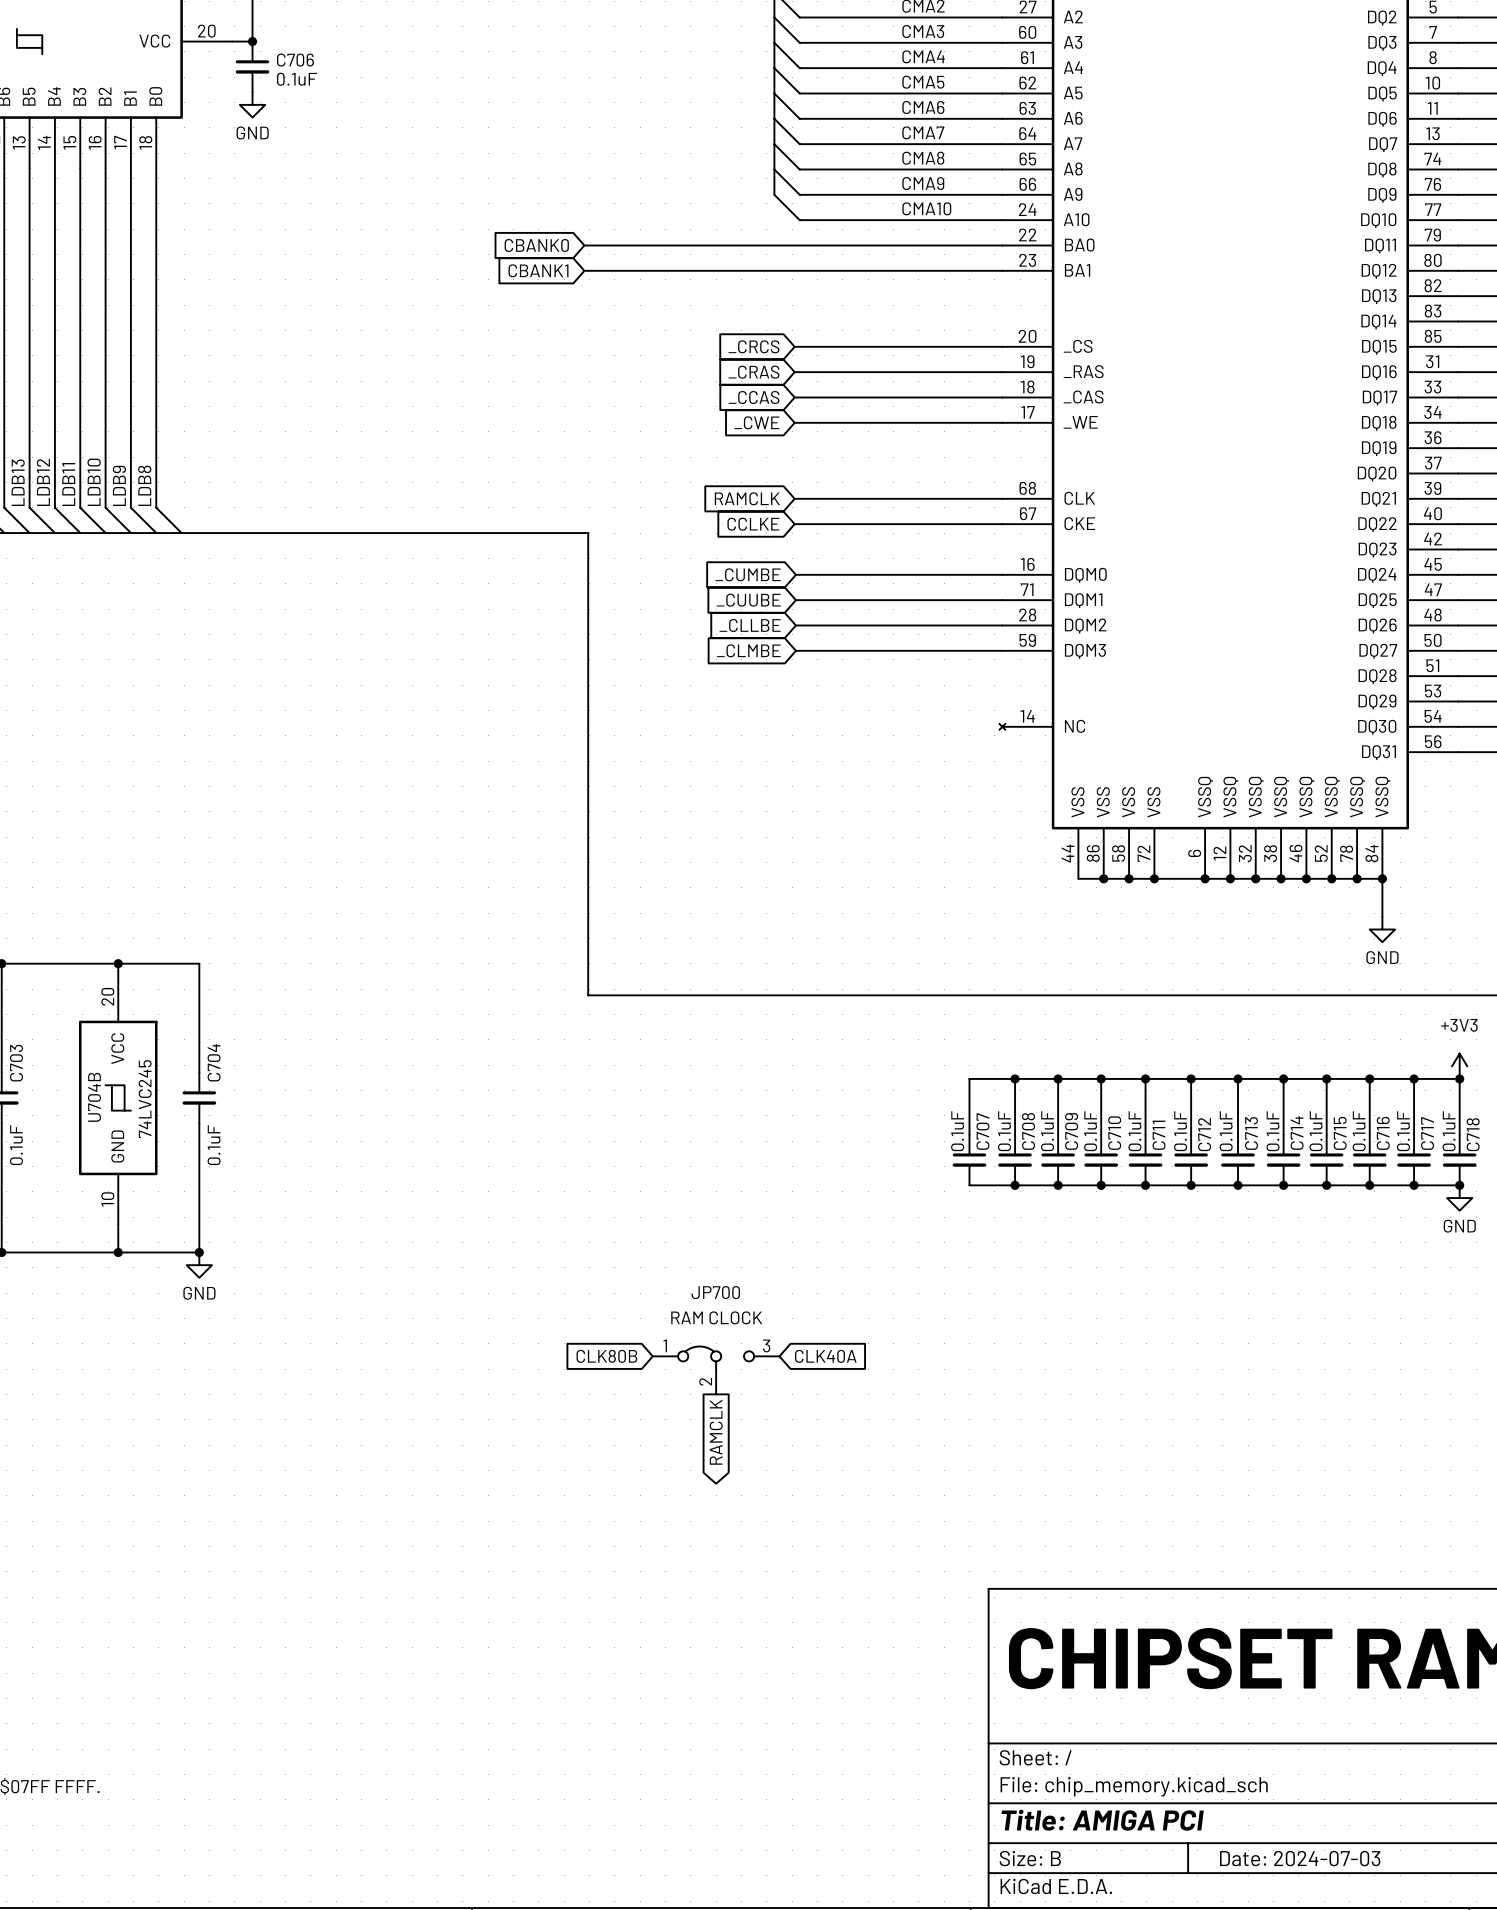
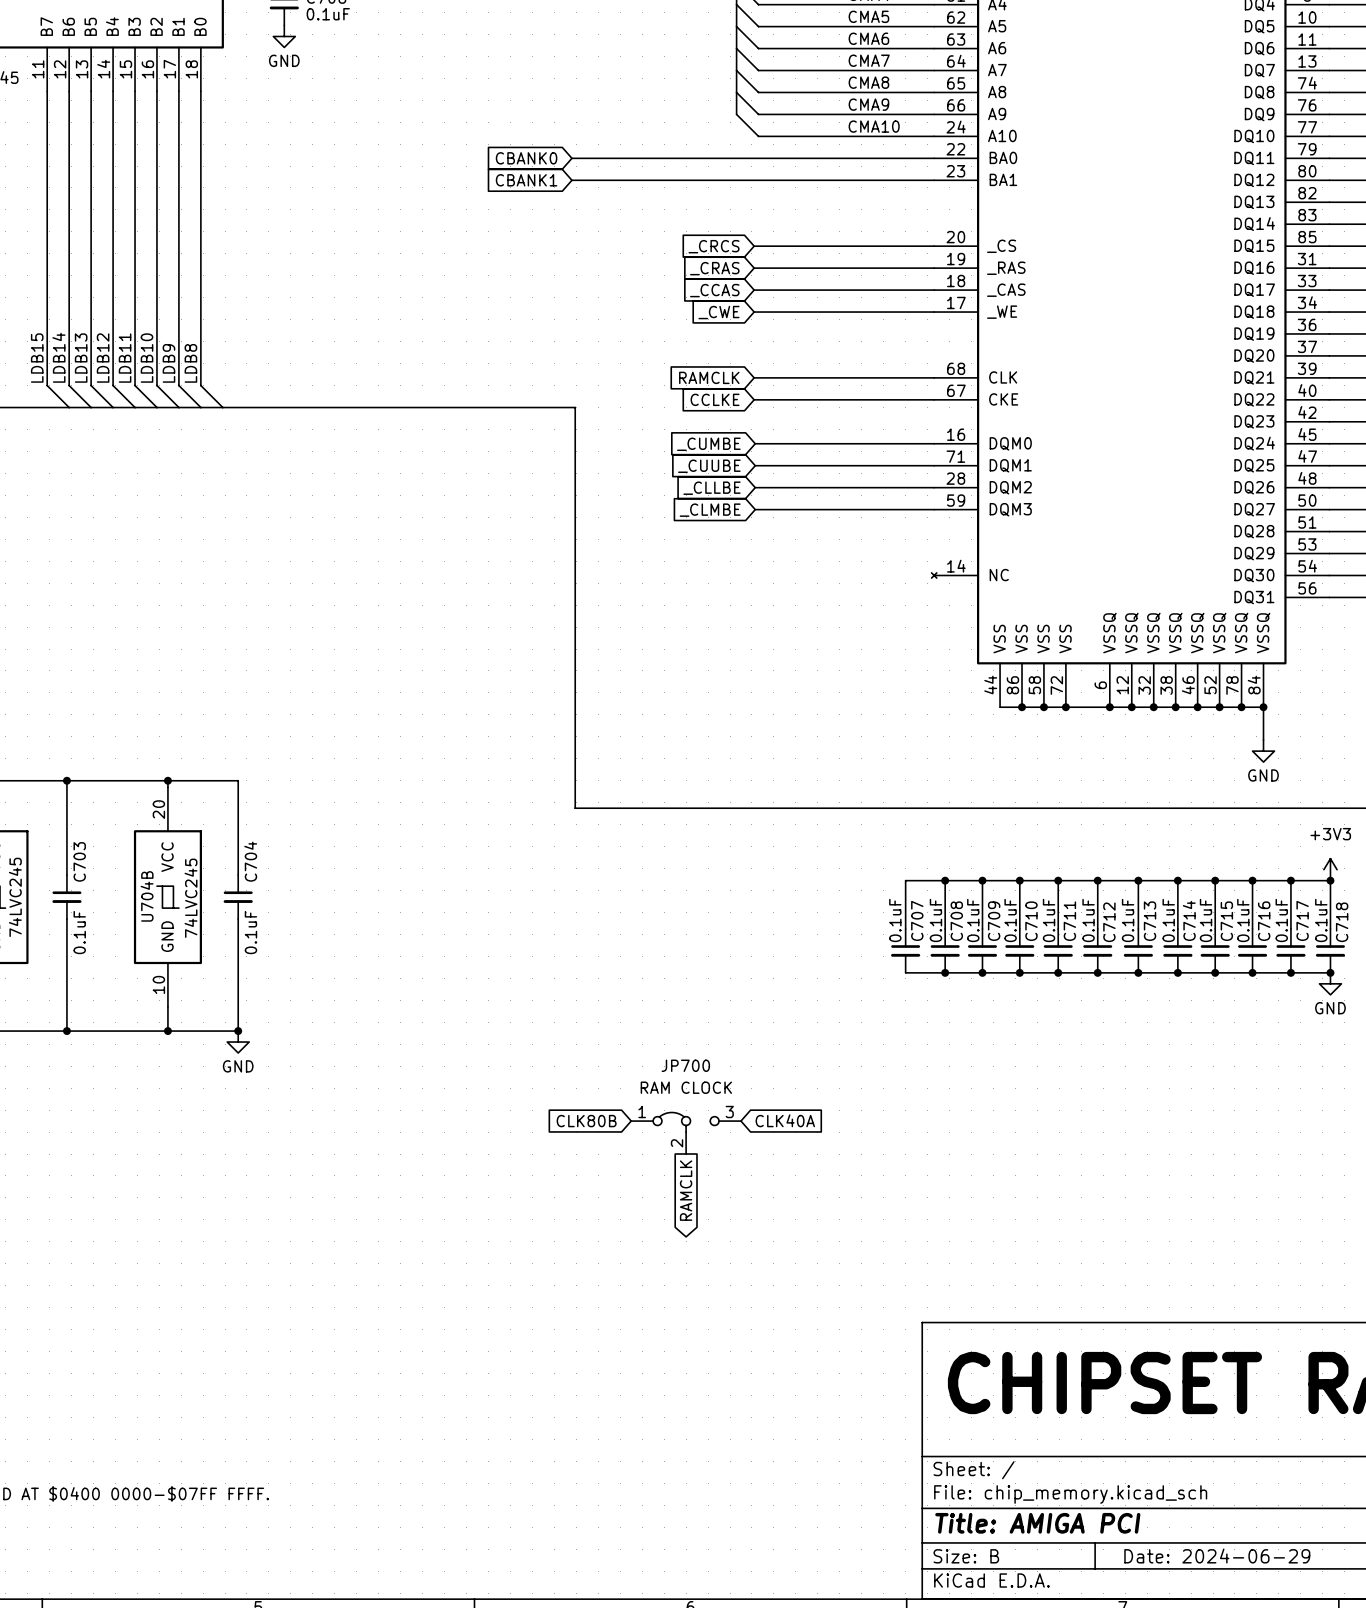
title block: Date: 2024-07-03 (1300, 1858) -> Date: 2024-06-29 (1217, 1556)

